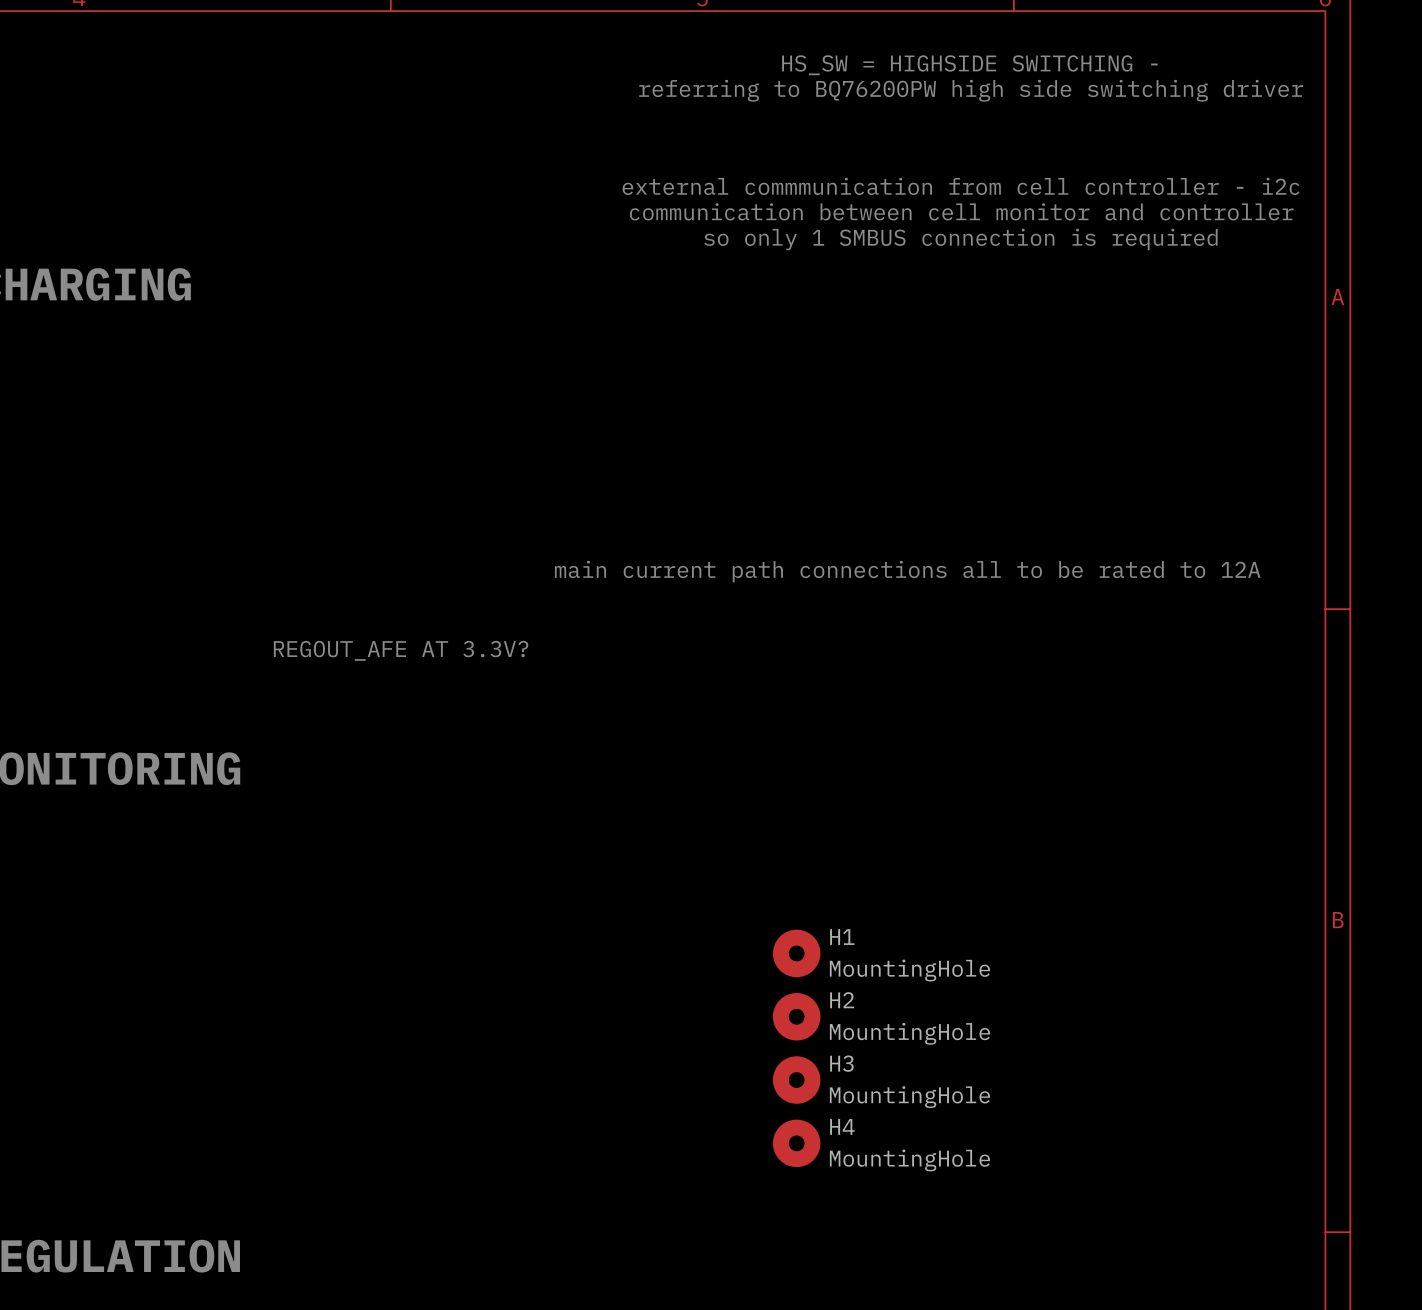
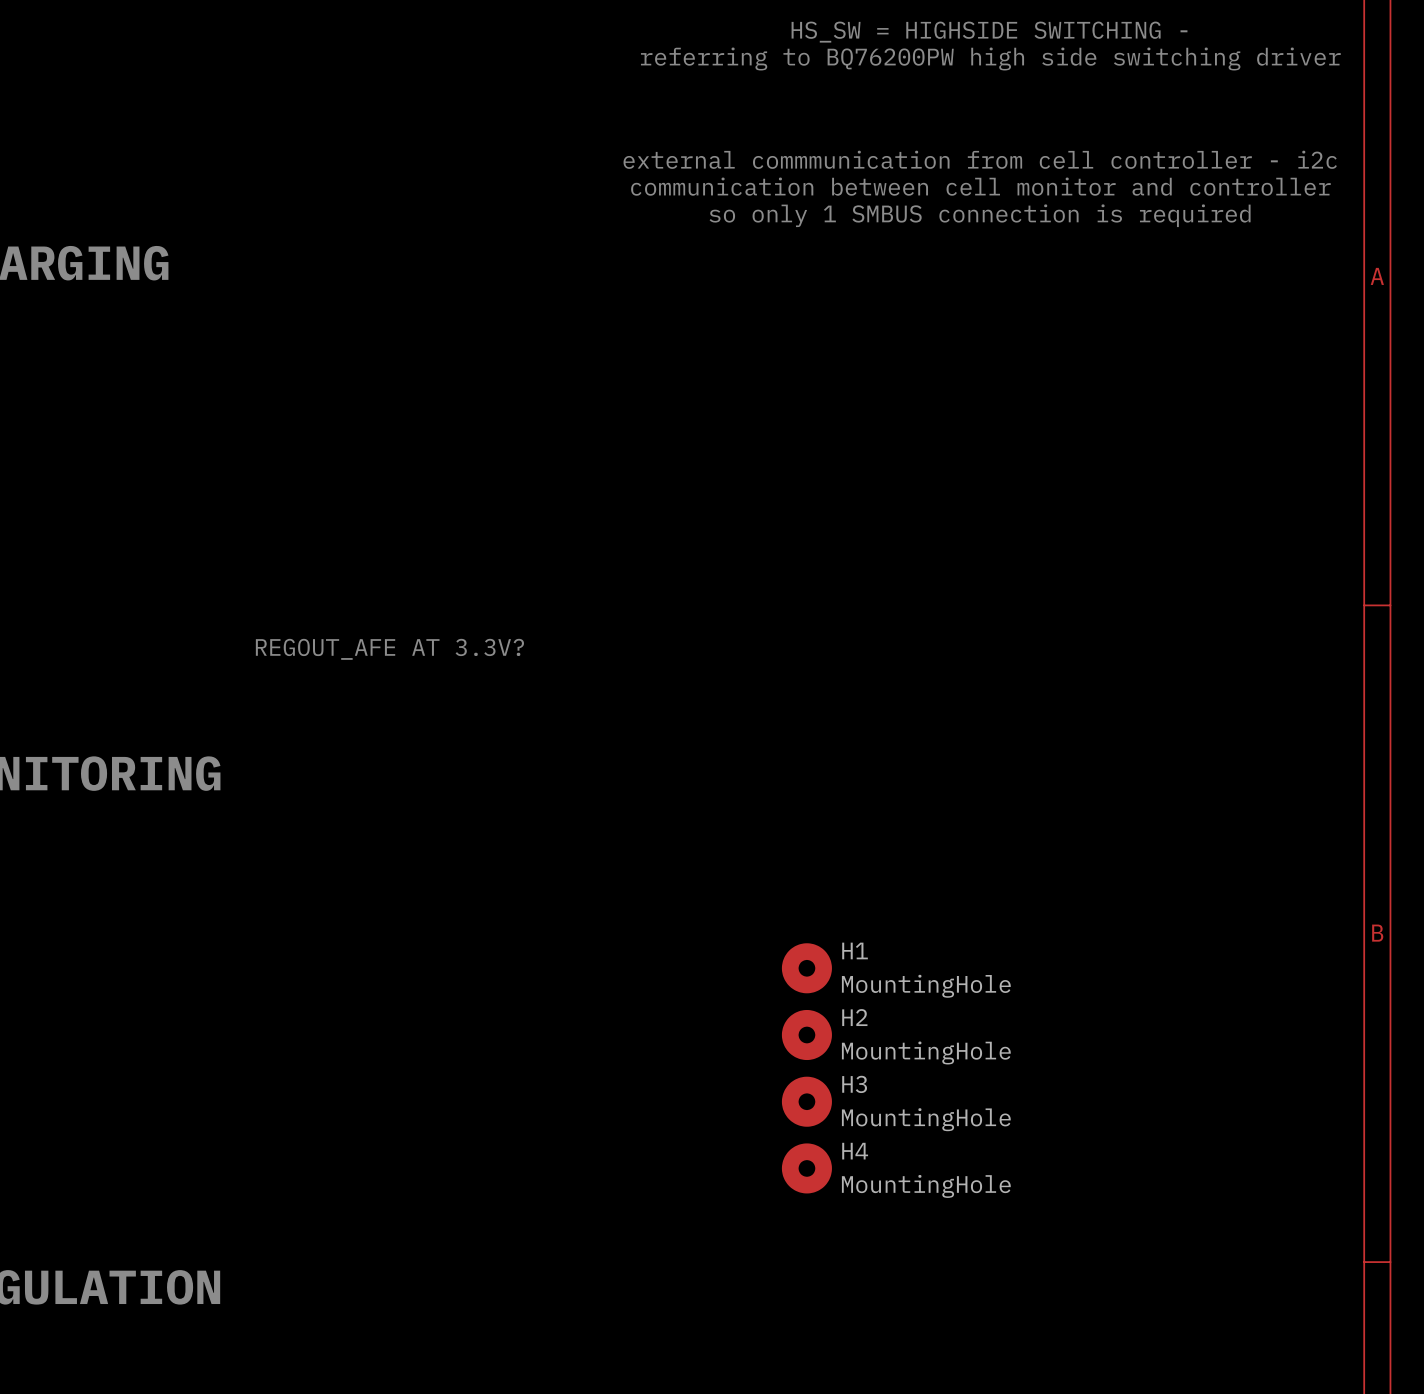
text: main current path connections all to be rated to 12A (907, 571) -> none

